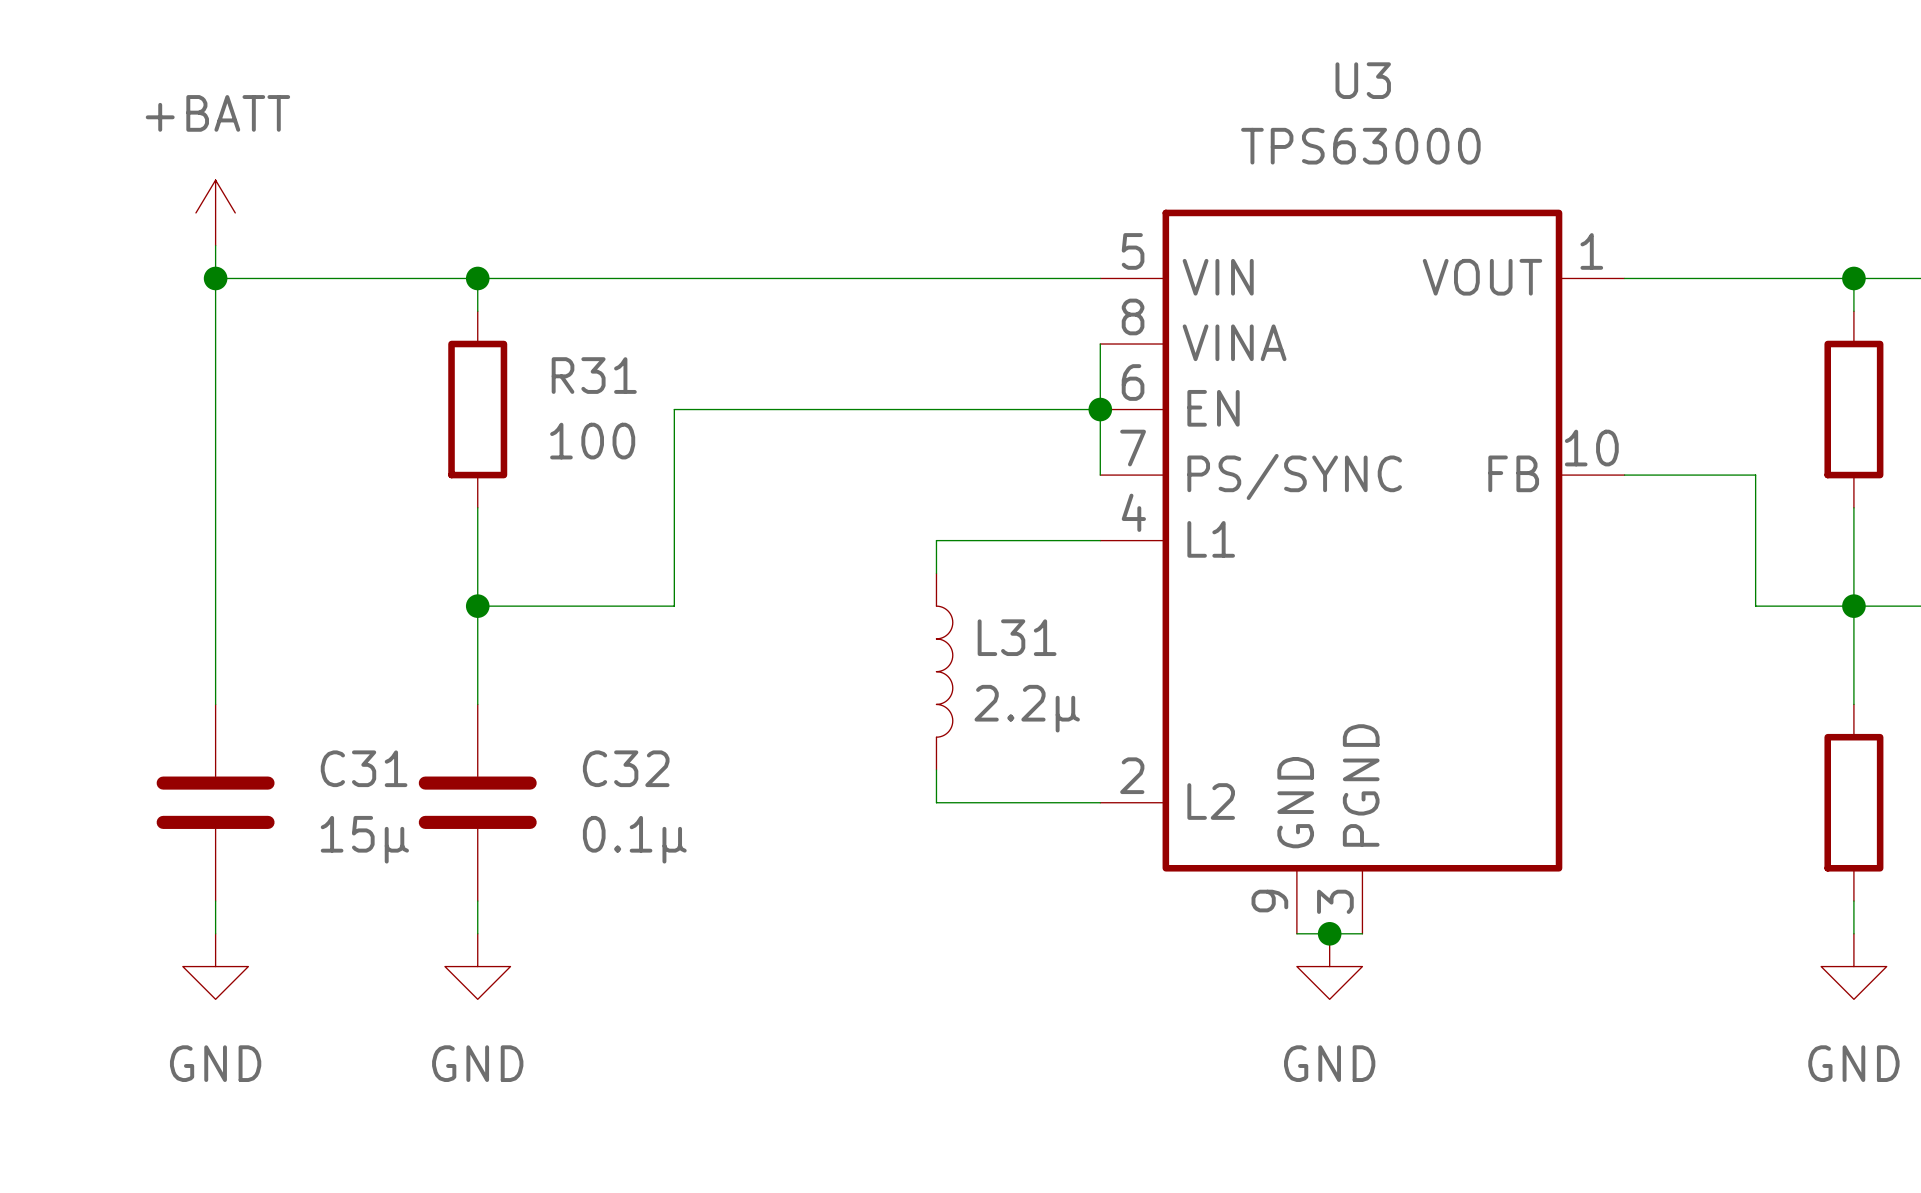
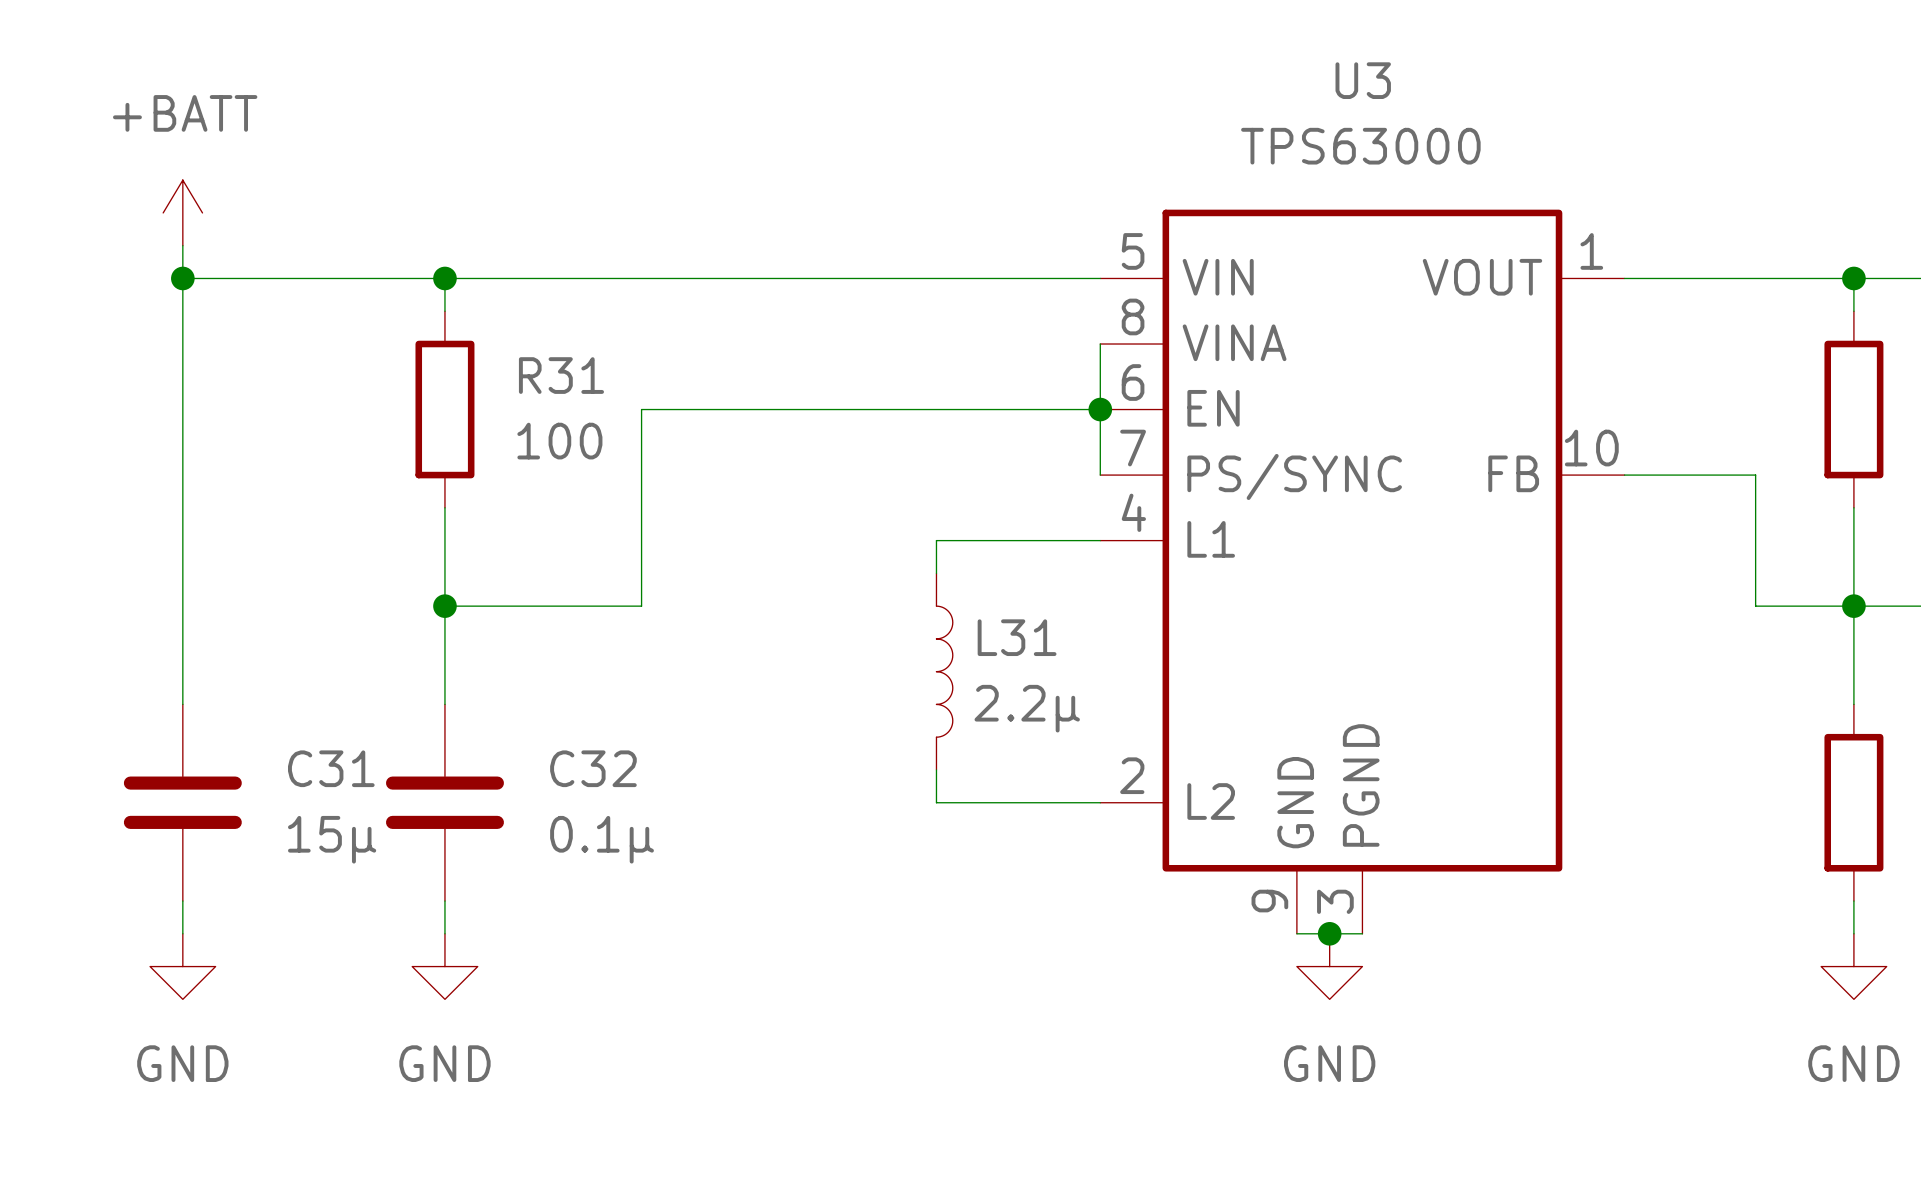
power symbol position: +BATT (215, 212) -> +BATT (182, 212)
wire: (215, 245) (215, 704) -> (182, 245) (182, 704)
wire: none -> (182, 278) (215, 278)
junction position: (215, 278) -> (182, 278)
wire: (477, 278) (477, 311) -> (444, 278) (444, 311)
junction position: (477, 278) -> (444, 278)
R31 position: (477, 409) -> (444, 409)
wire: (674, 409) (674, 606) (641, 606) -> (674, 409) (641, 409) (641, 606)
wire: (477, 507) (477, 704) -> (444, 507) (444, 704)
wire: none -> (444, 606) (477, 606)
junction position: (477, 606) -> (444, 606)
C31 position: (215, 802) -> (182, 802)
C32 position: (477, 802) -> (444, 802)
wire: (215, 901) (215, 933) -> (182, 901) (182, 933)
wire: (477, 901) (477, 933) -> (444, 901) (444, 933)
power symbol position: GND (215, 966) -> GND (182, 966)
power symbol position: GND (477, 966) -> GND (444, 966)

